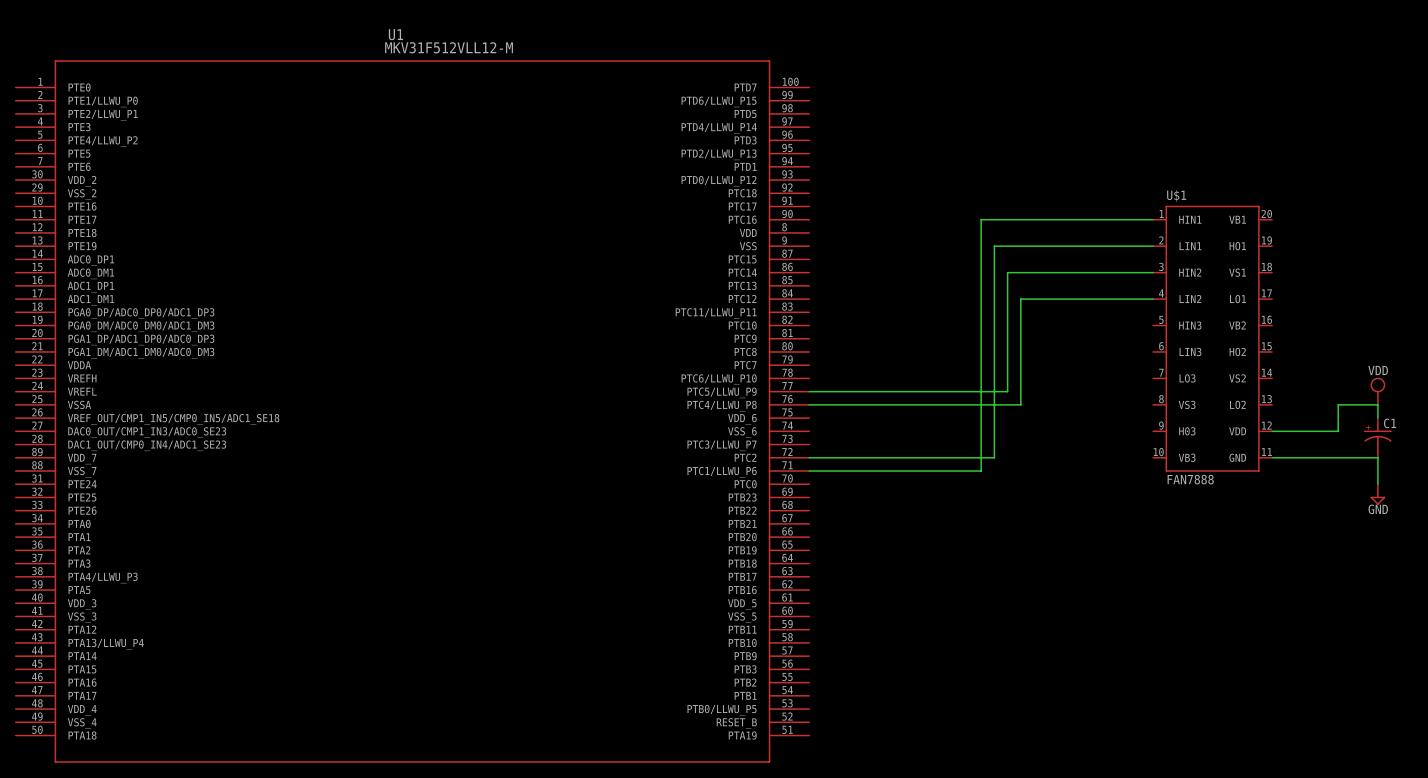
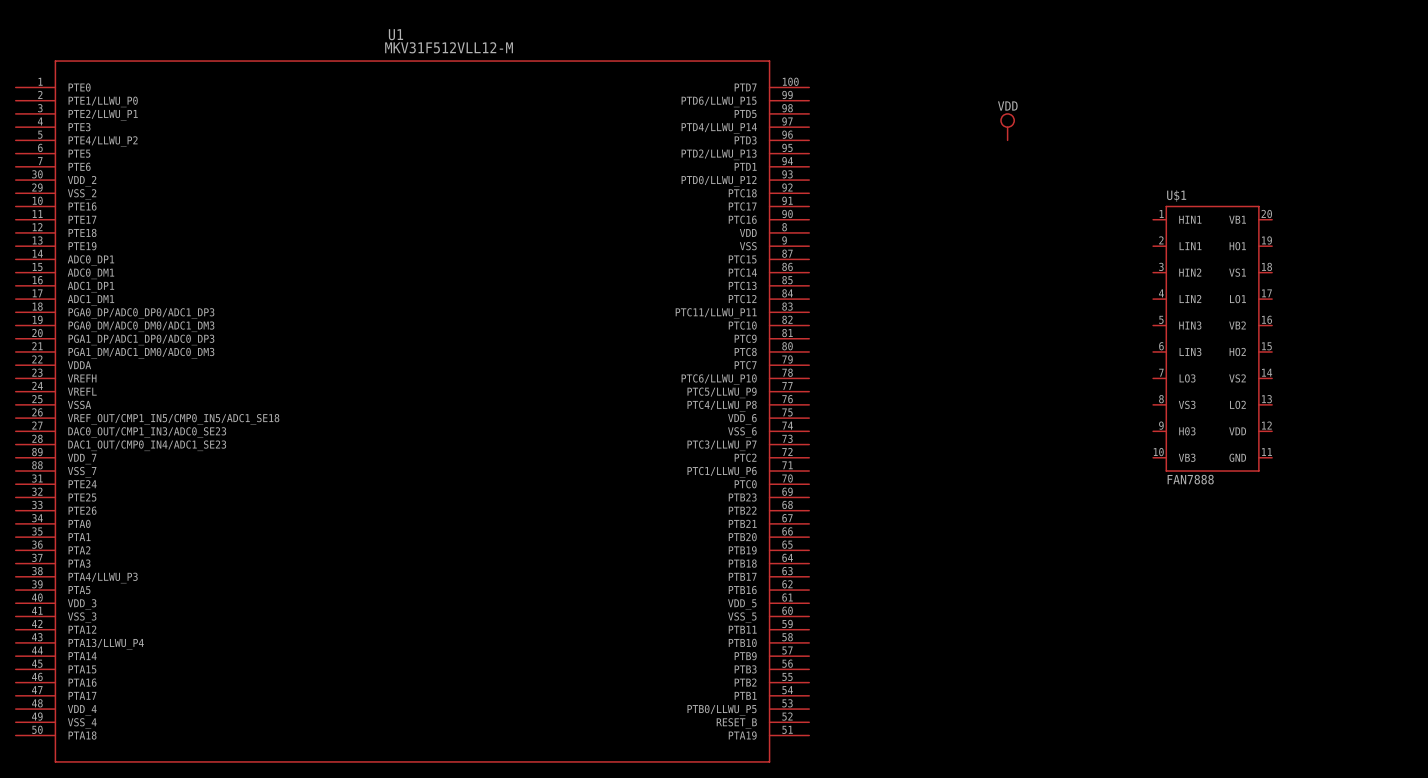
power symbol: none -> VDD (1007, 126)
wire: (1153, 219) (981, 219) (981, 471) (809, 471) -> none
wire: (1153, 246) (994, 246) (994, 457) (809, 457) -> none
wire: (1153, 272) (1007, 272) (1007, 391) (809, 391) -> none
wire: (1153, 299) (1020, 299) (1020, 404) (809, 404) -> none
power symbol: VDD (1377, 391) -> none
wire: (1377, 418) (1377, 404) (1338, 404) (1338, 431) (1272, 431) -> none
C1: (1377, 437) -> none
wire: (1272, 457) (1377, 457) (1377, 484) -> none
power symbol: GND (1377, 494) -> none

